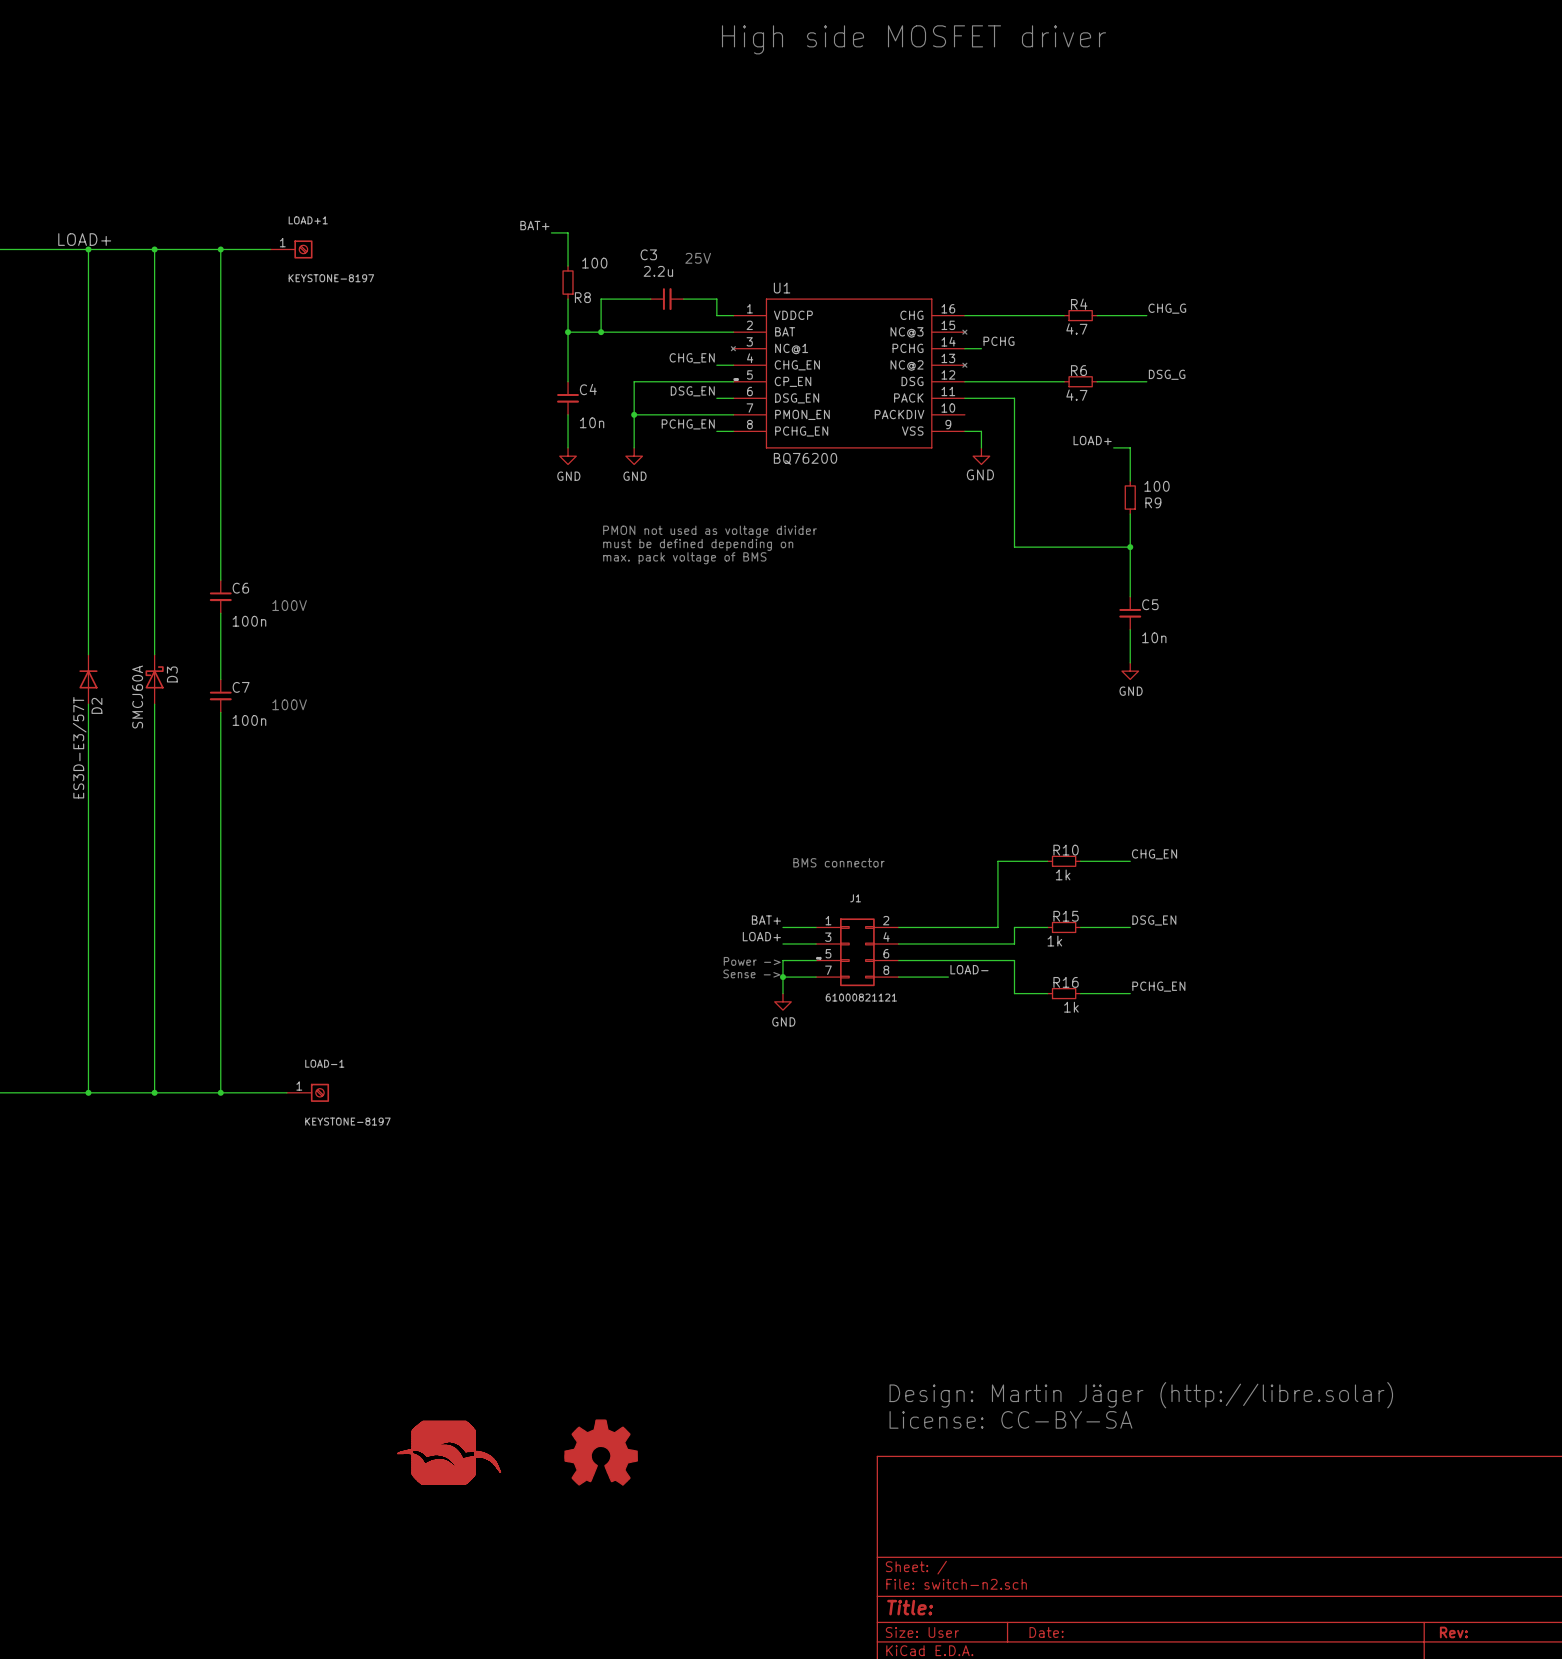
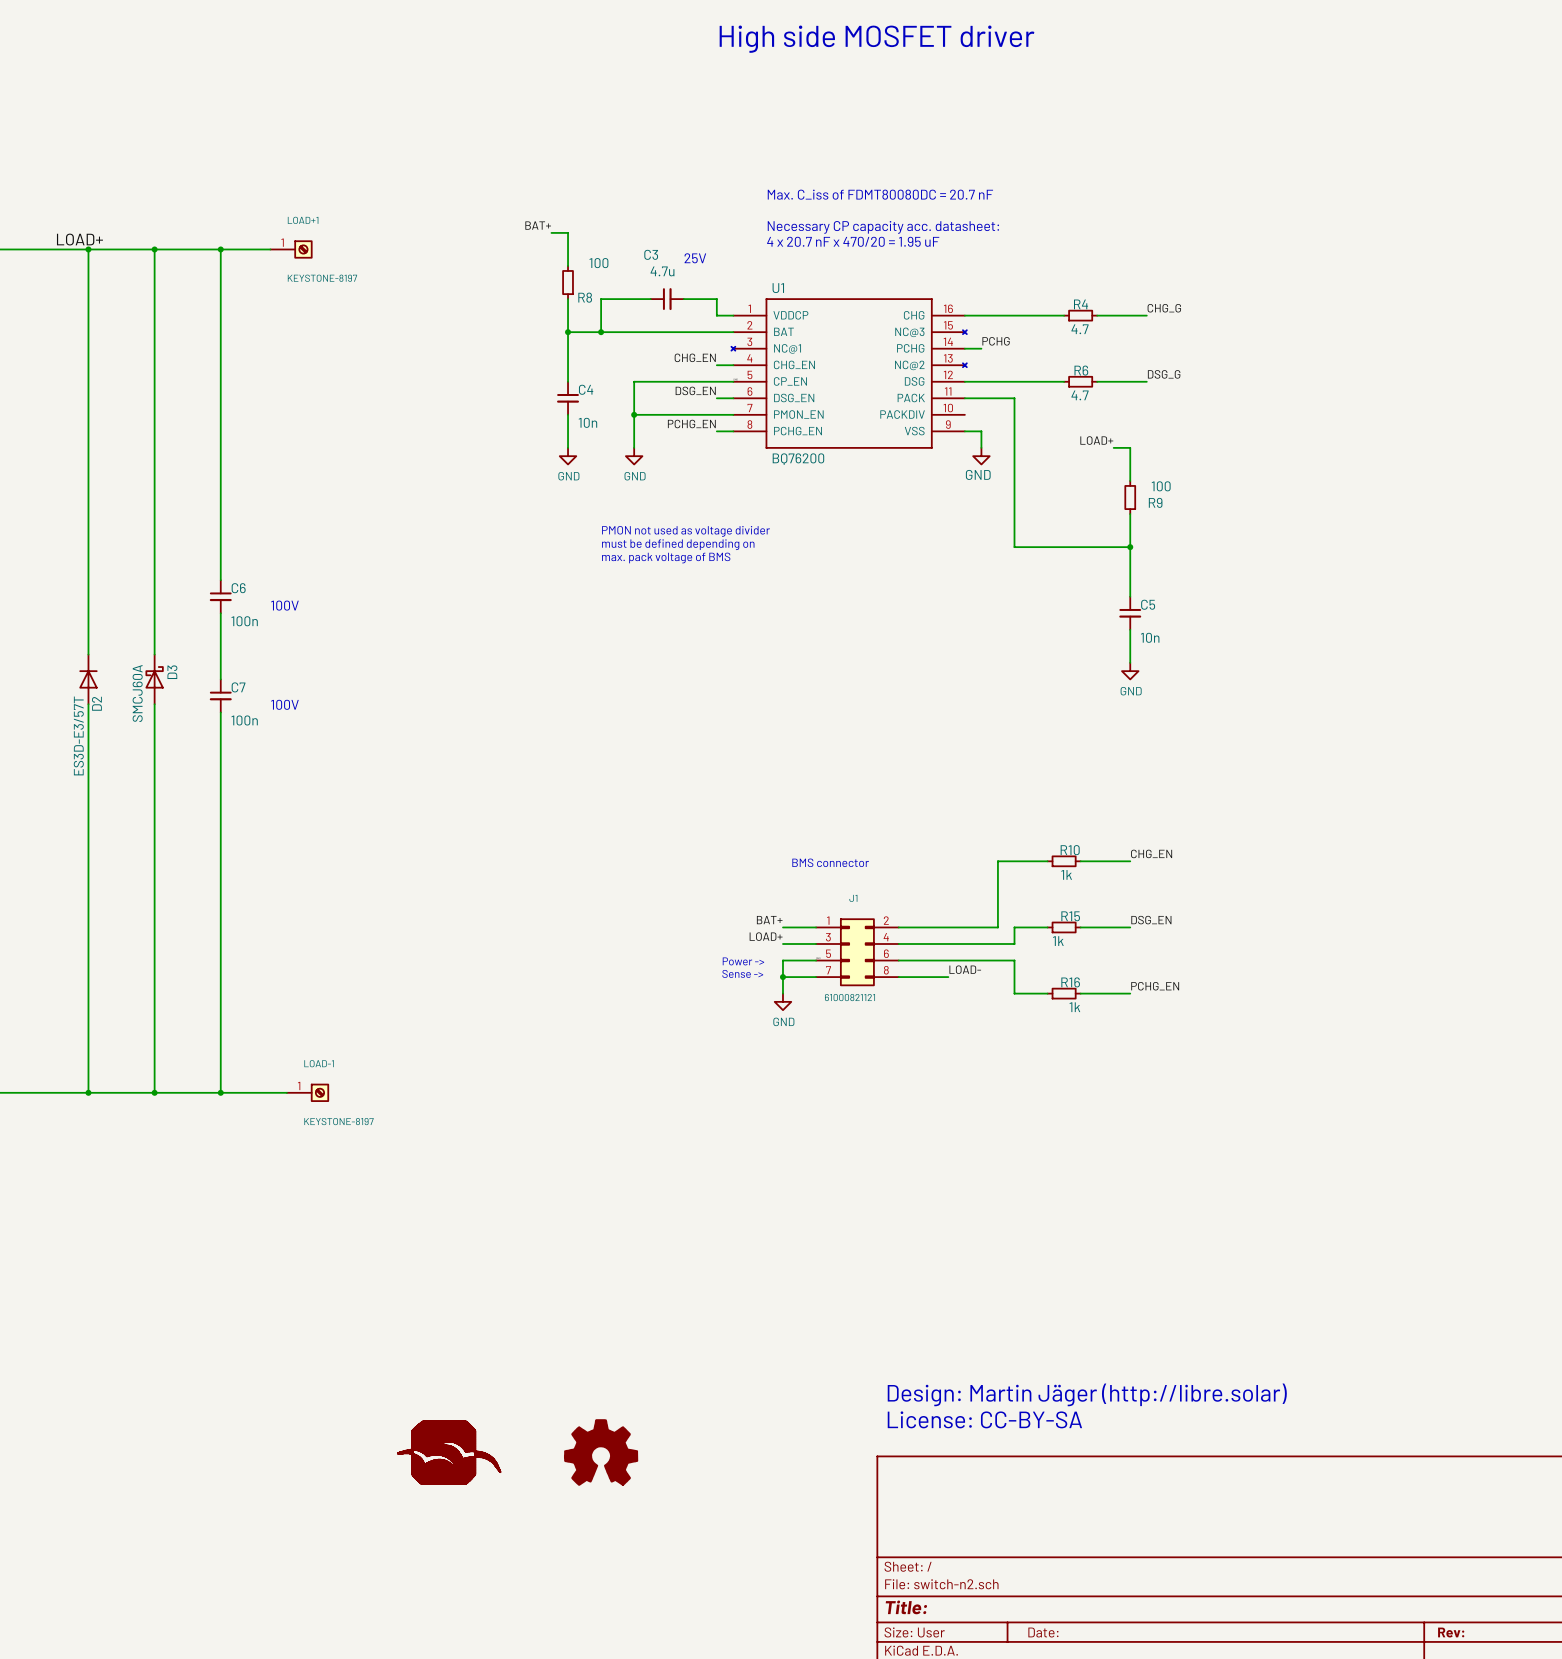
text: none -> Max. C_iss of FDMT80080DC = 20.7 nF (880, 194)
text: none -> Necessary CP capacity acc. datasheet: (883, 227)
text: none -> 4 x 20.7 nF x 470/20 = 1.95 uF (853, 241)
C3 value: 2.2u (658, 271) -> 4.7u (662, 271)

